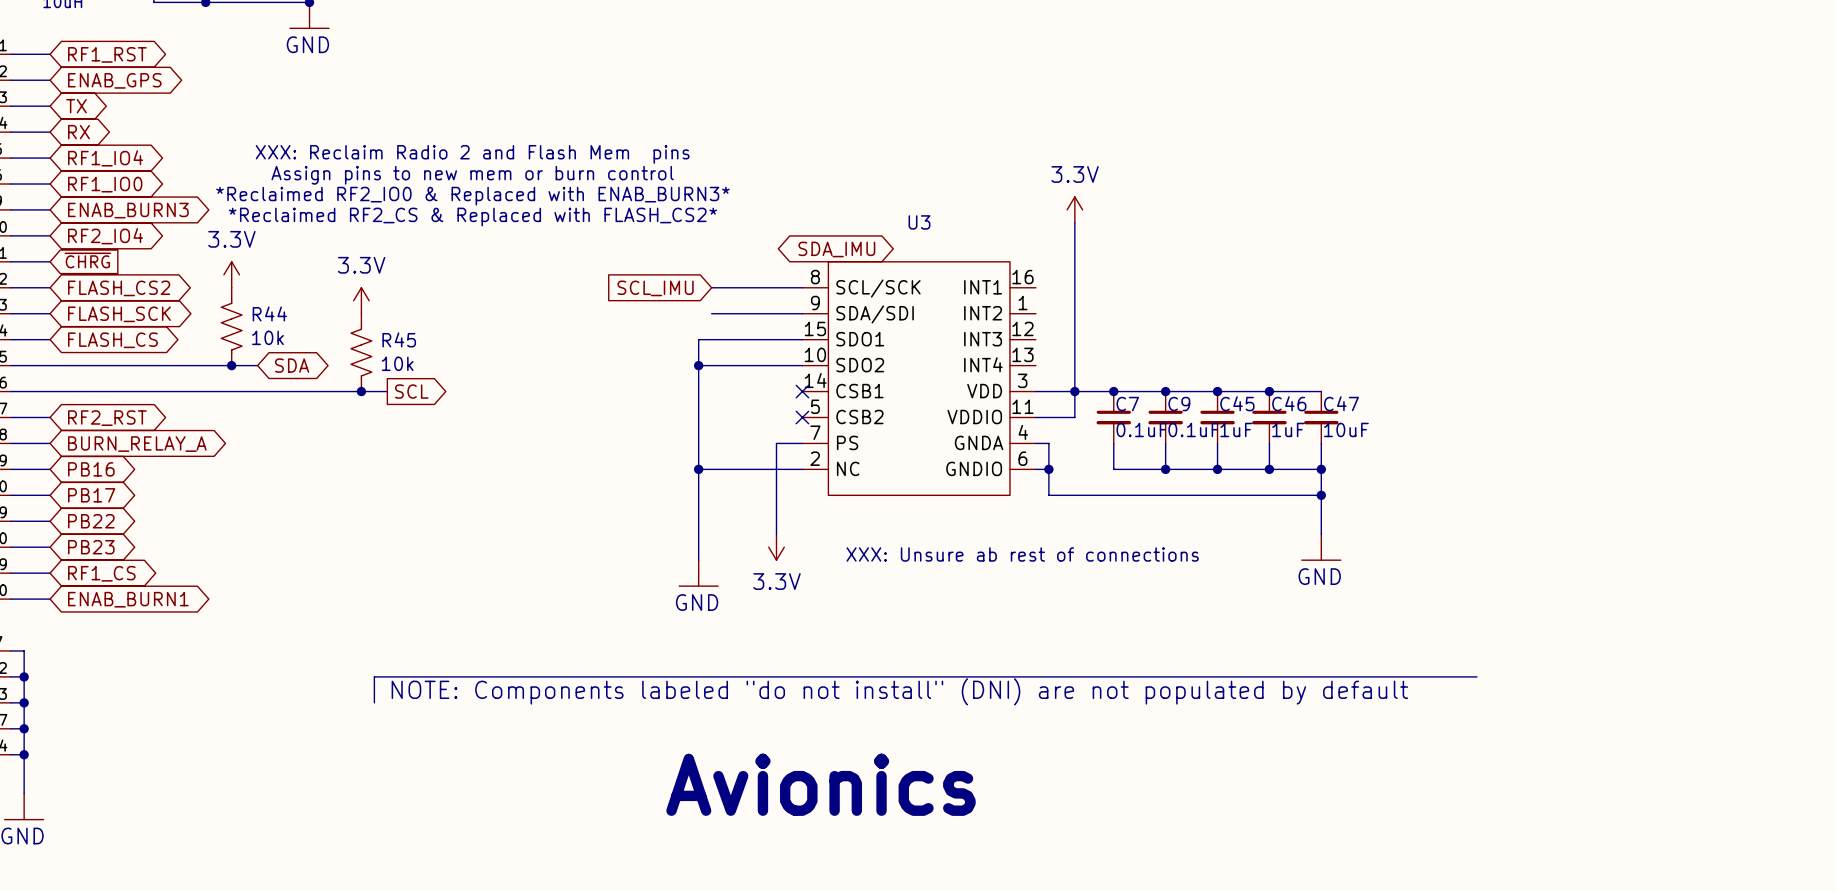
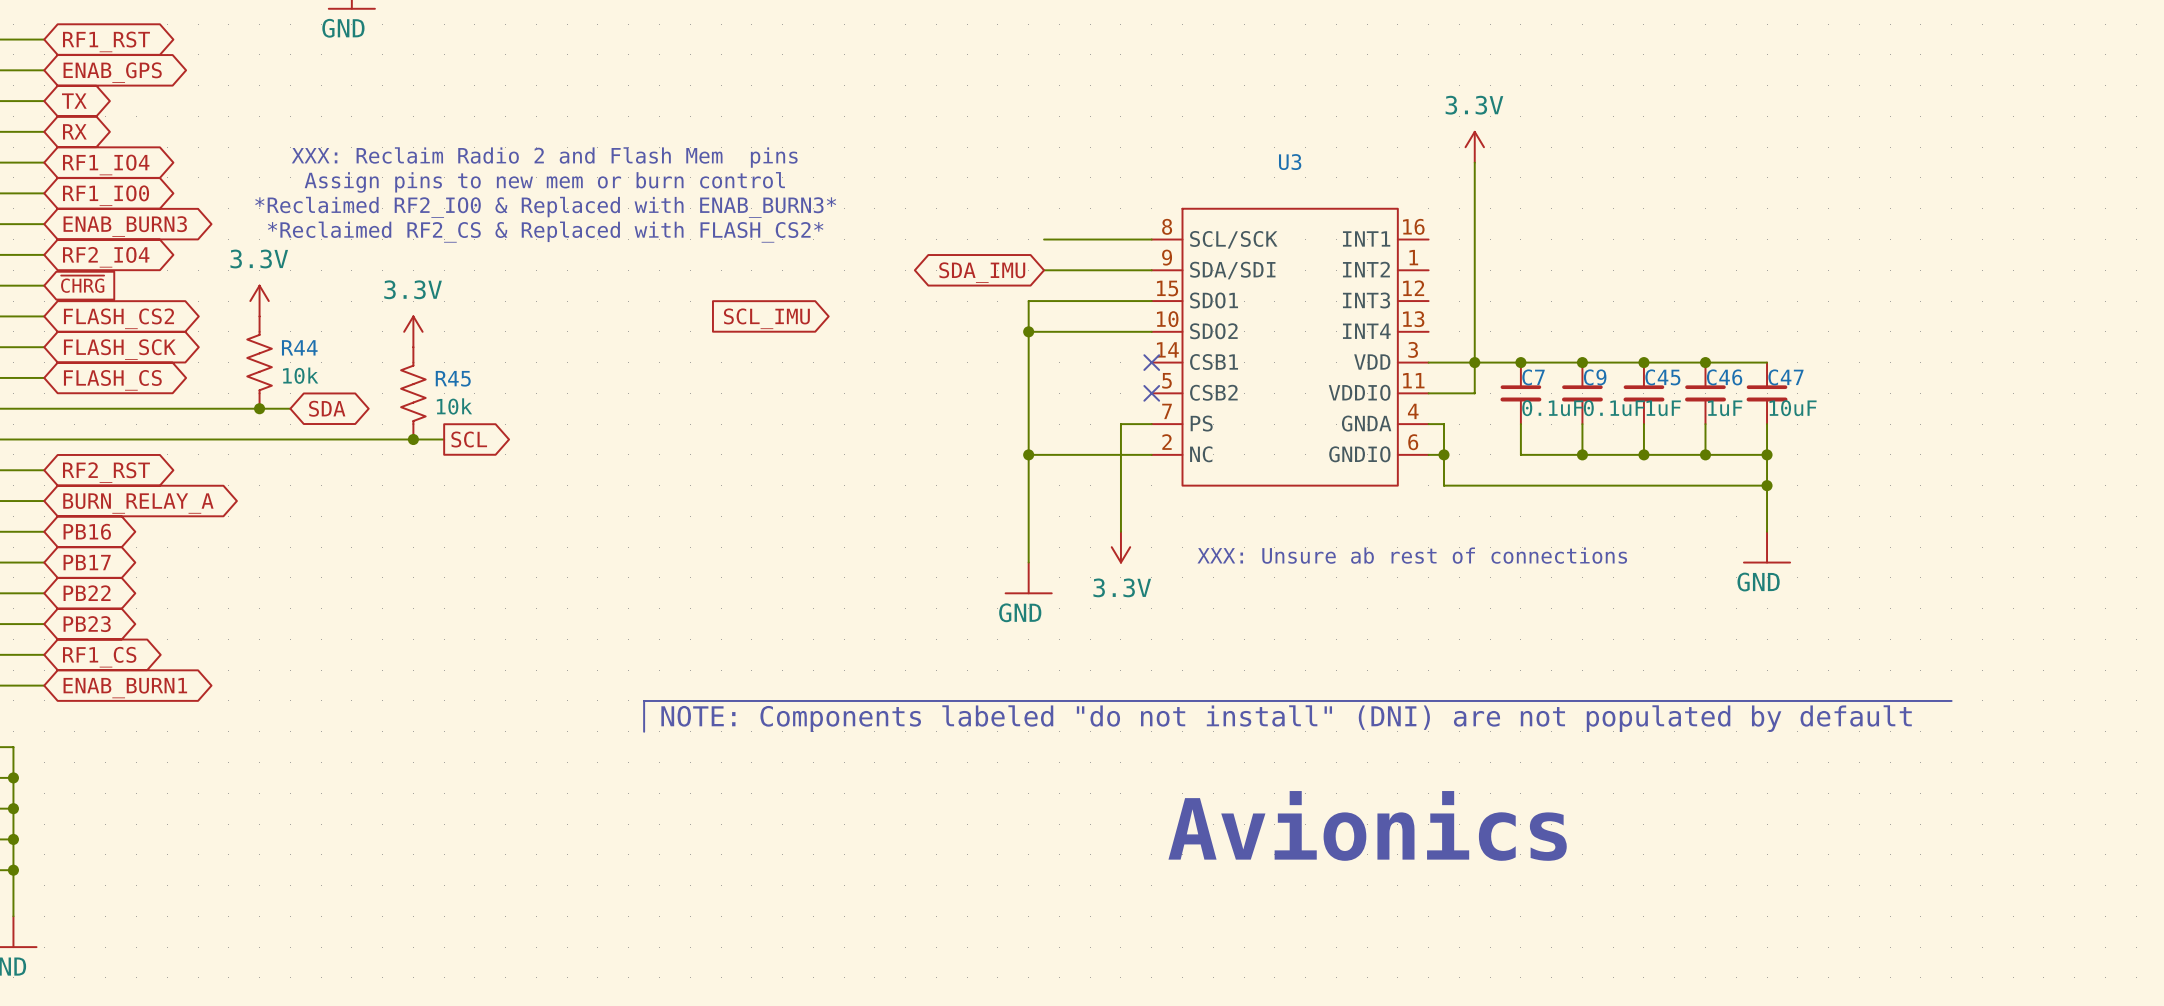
power symbol: none -> 3.3V (1474, 147)
power symbol: 3.3V (1074, 209) -> none
wire: (1074, 222) (1074, 417) (1035, 417) -> (1474, 162) (1474, 393) (1428, 393)
wire: (711, 287) (802, 287) -> (1044, 239) (1151, 239)
junction: none -> (1028, 331)
wire: (711, 313) (802, 313) -> (1044, 270) (1151, 270)
no-connect mark: none -> (1151, 362)
junction: none -> (1474, 362)
junction: none -> (1520, 362)
junction: none -> (1582, 362)
junction: none -> (1643, 362)
junction: none -> (1705, 362)
wire: (802, 339) (698, 339) (698, 560) -> (1151, 301) (1028, 301) (1028, 562)
no-connect mark: none -> (1151, 393)
wire: (698, 365) (802, 365) -> (1028, 331) (1151, 331)
junction: (698, 365) -> none
U3 position: (919, 378) -> (1290, 347)
no-connect mark: (802, 391) -> none
wire: (1035, 391) (1321, 391) -> (1428, 362) (1767, 362)
junction: (1074, 391) -> none
junction: (1113, 391) -> none
junction: (1165, 391) -> none
junction position: (1217, 391) -> (1443, 454)
junction: (1269, 391) -> none
junction: none -> (1028, 454)
junction: none -> (1582, 454)
junction: none -> (1643, 454)
junction: none -> (1705, 454)
junction: none -> (1767, 454)
no-connect mark: (802, 417) -> none
C7 position: (1113, 417) -> (1520, 393)
C9 position: (1165, 417) -> (1582, 393)
C45 position: (1217, 417) -> (1643, 393)
C46 position: (1269, 417) -> (1705, 393)
C47 position: (1321, 417) -> (1767, 393)
junction: none -> (1767, 485)
wire: (802, 443) (776, 443) (776, 534) -> (1151, 424) (1120, 424) (1120, 531)
wire: (1035, 443) (1048, 443) (1048, 495) (1321, 495) -> (1428, 424) (1443, 424) (1443, 485) (1767, 485)
wire: (1113, 443) (1113, 469) (1321, 469) -> (1520, 424) (1520, 454) (1767, 454)
wire: (1165, 443) (1165, 469) -> (1582, 424) (1582, 454)
wire: (1217, 443) (1217, 469) -> (1643, 424) (1643, 454)
wire: (1269, 443) (1269, 469) -> (1705, 424) (1705, 454)
wire: (1321, 443) (1321, 534) -> (1767, 424) (1767, 531)
wire: (698, 469) (802, 469) -> (1028, 454) (1151, 454)
junction: (698, 469) -> none
wire: (1035, 469) (1048, 469) -> (1428, 454) (1443, 454)
junction: (1048, 469) -> none
junction: (1165, 469) -> none
junction: (1217, 469) -> none
junction: (1269, 469) -> none
junction: (1321, 469) -> none
power symbol: none -> 3.3V (1120, 547)
junction: (1321, 495) -> none
power symbol: 3.3V (776, 547) -> none
power symbol position: GND (1321, 547) -> GND (1767, 547)
text position: XXX: Unsure ab rest of connections (1022, 554) -> XXX: Unsure ab rest of connections (1412, 555)
power symbol position: GND (698, 573) -> GND (1028, 577)
line: (1476, 676) (374, 676) (374, 702) -> (1951, 700) (644, 700) (644, 731)
text position: NOTE: Components labeled "do not install" (DNI) are not populated by default (899, 691) -> NOTE: Components labeled "do not install" (DNI) are not populated by default (1286, 718)
text: none -> Avionics (1367, 825)
text: Avionics (821, 784) -> none

